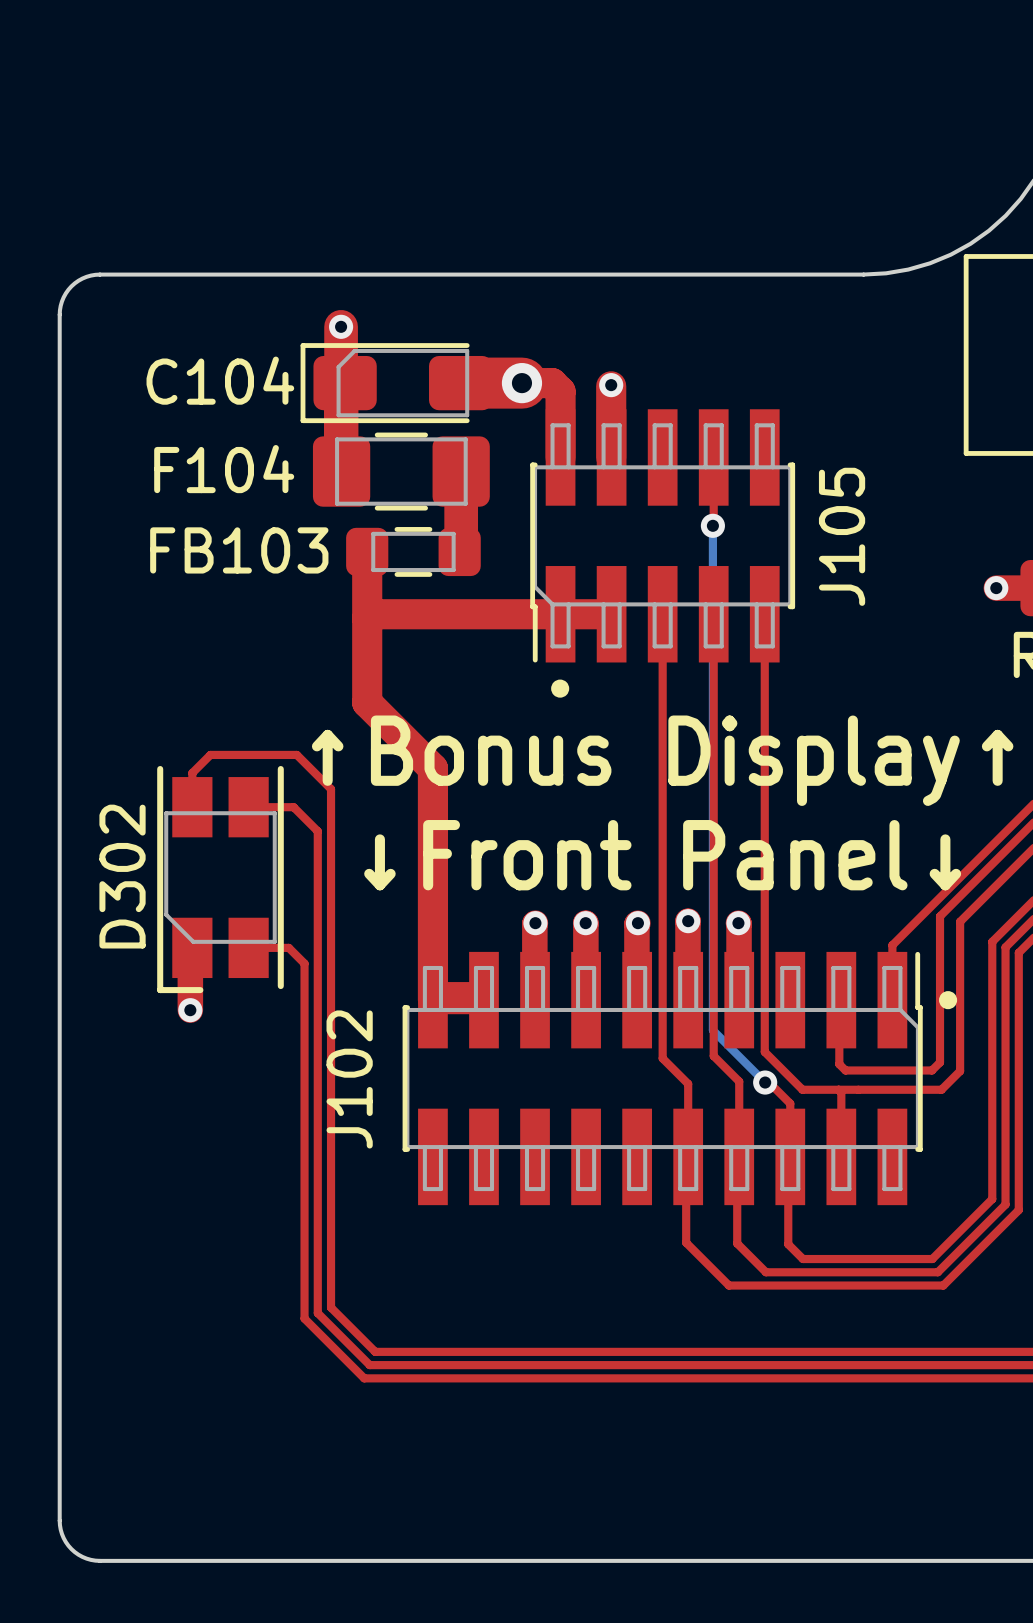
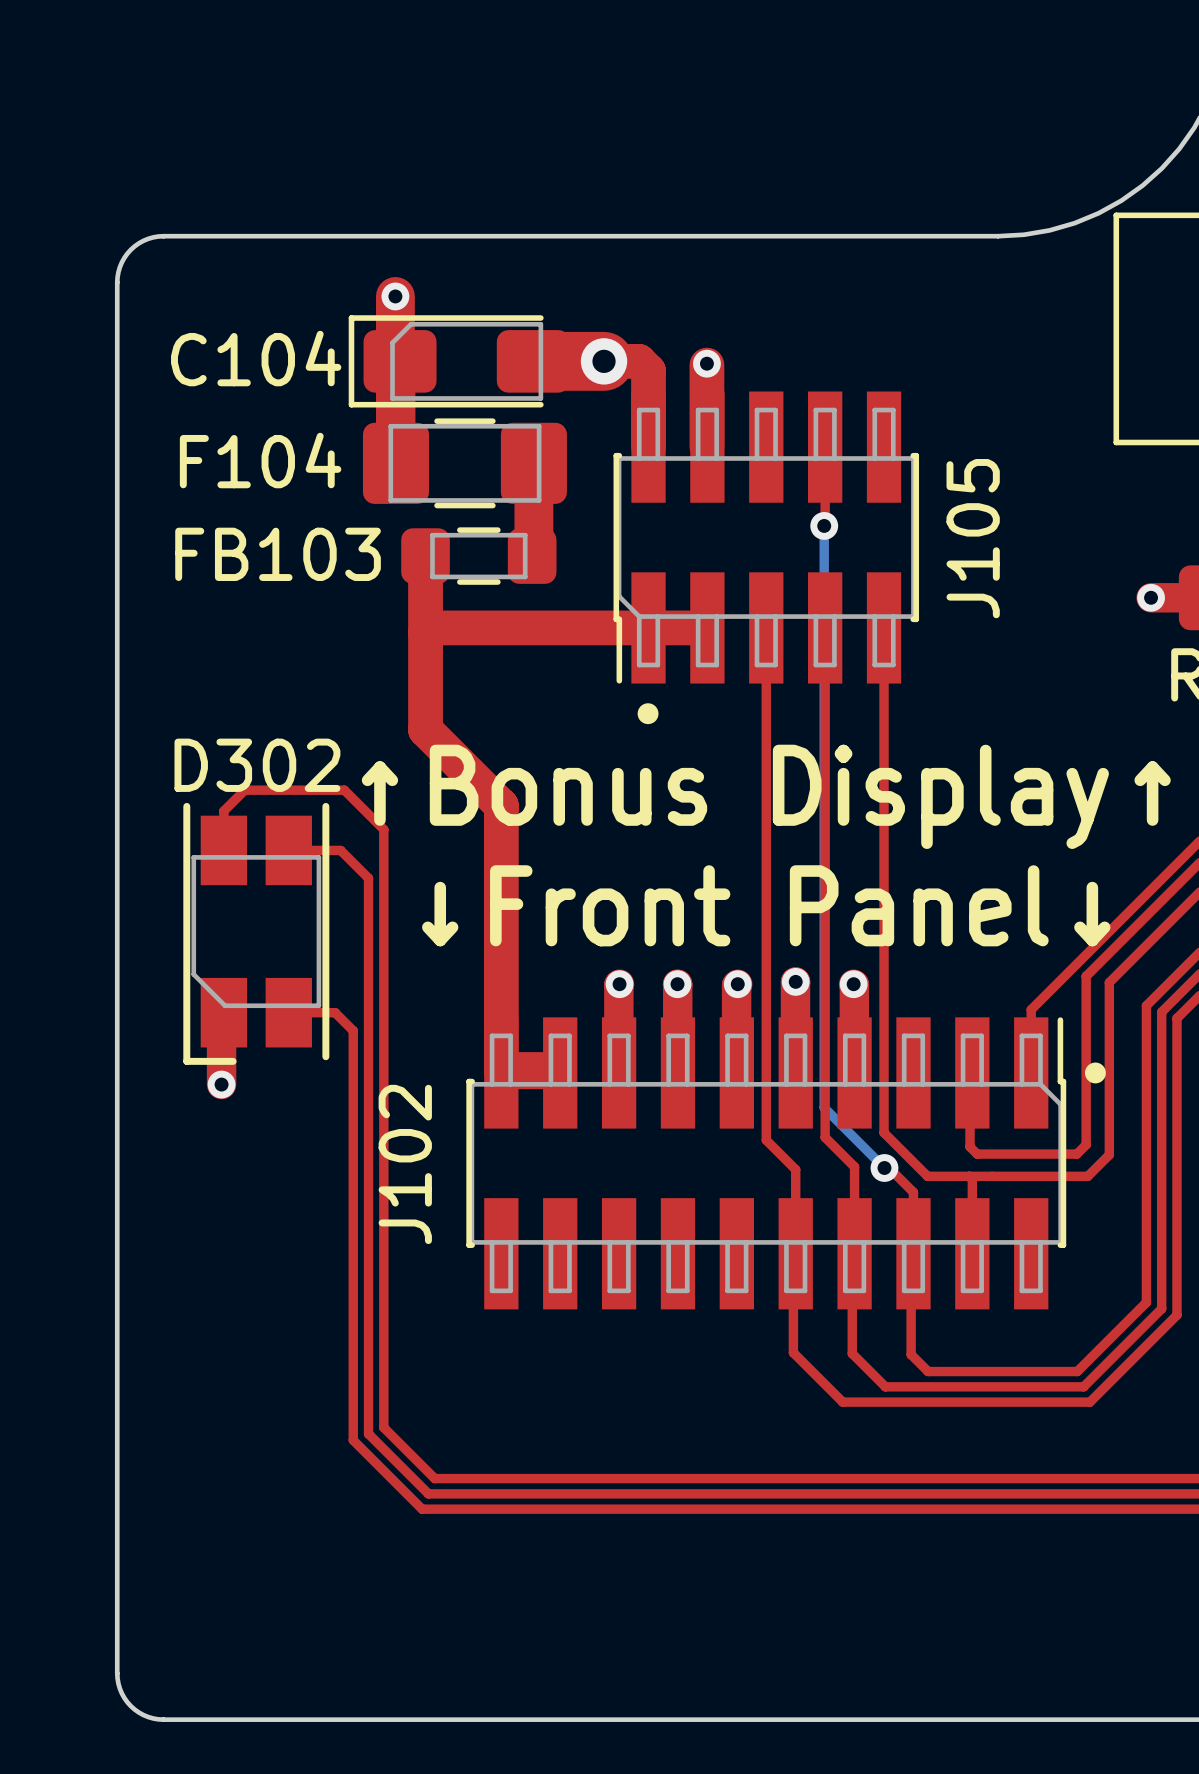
board edge: (140, 274) (95, 274) (82, 278) (74, 283) (65, 293) (60, 305) (59, 314) (59, 1525) (63, 1538) (68, 1545) (82, 1556) (95, 1560) (140, 1560) -> (163, 236) (143, 240) (130, 249) (119, 267) (117, 282) (117, 1673) (119, 1688) (130, 1706) (148, 1717) (163, 1719)
D302 name rotation: 0° (122, 876) -> 90° clockwise (257, 765)

